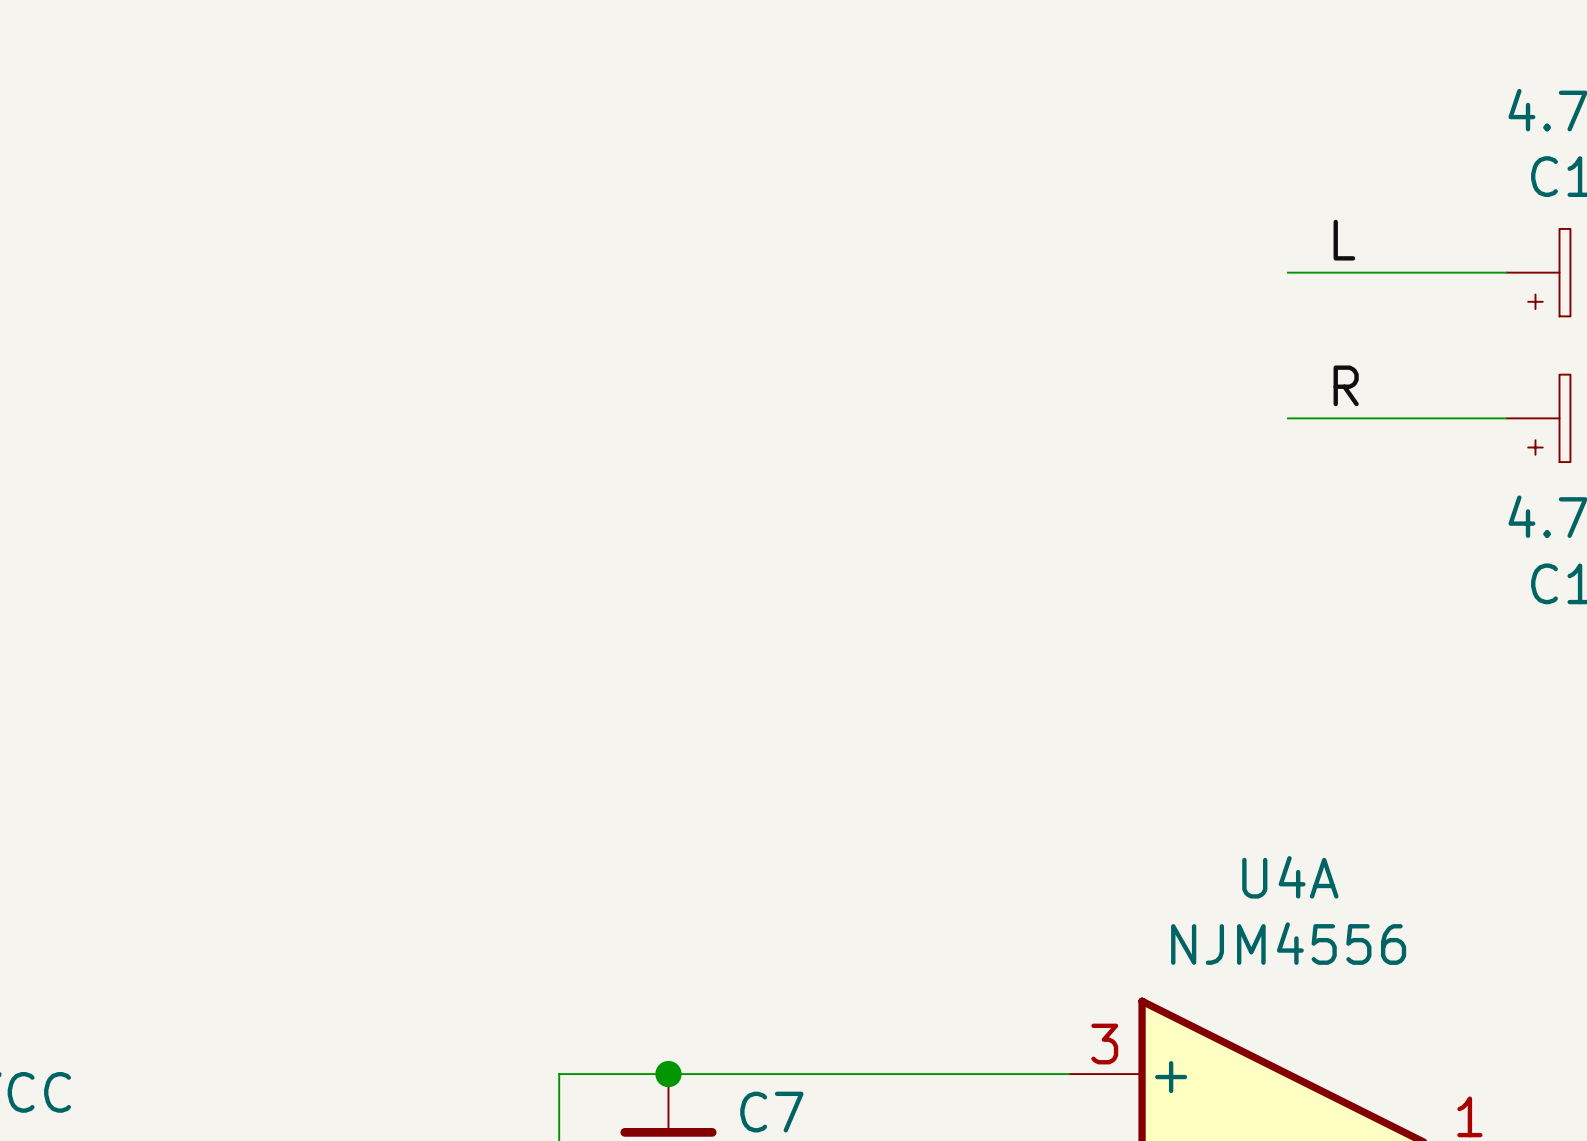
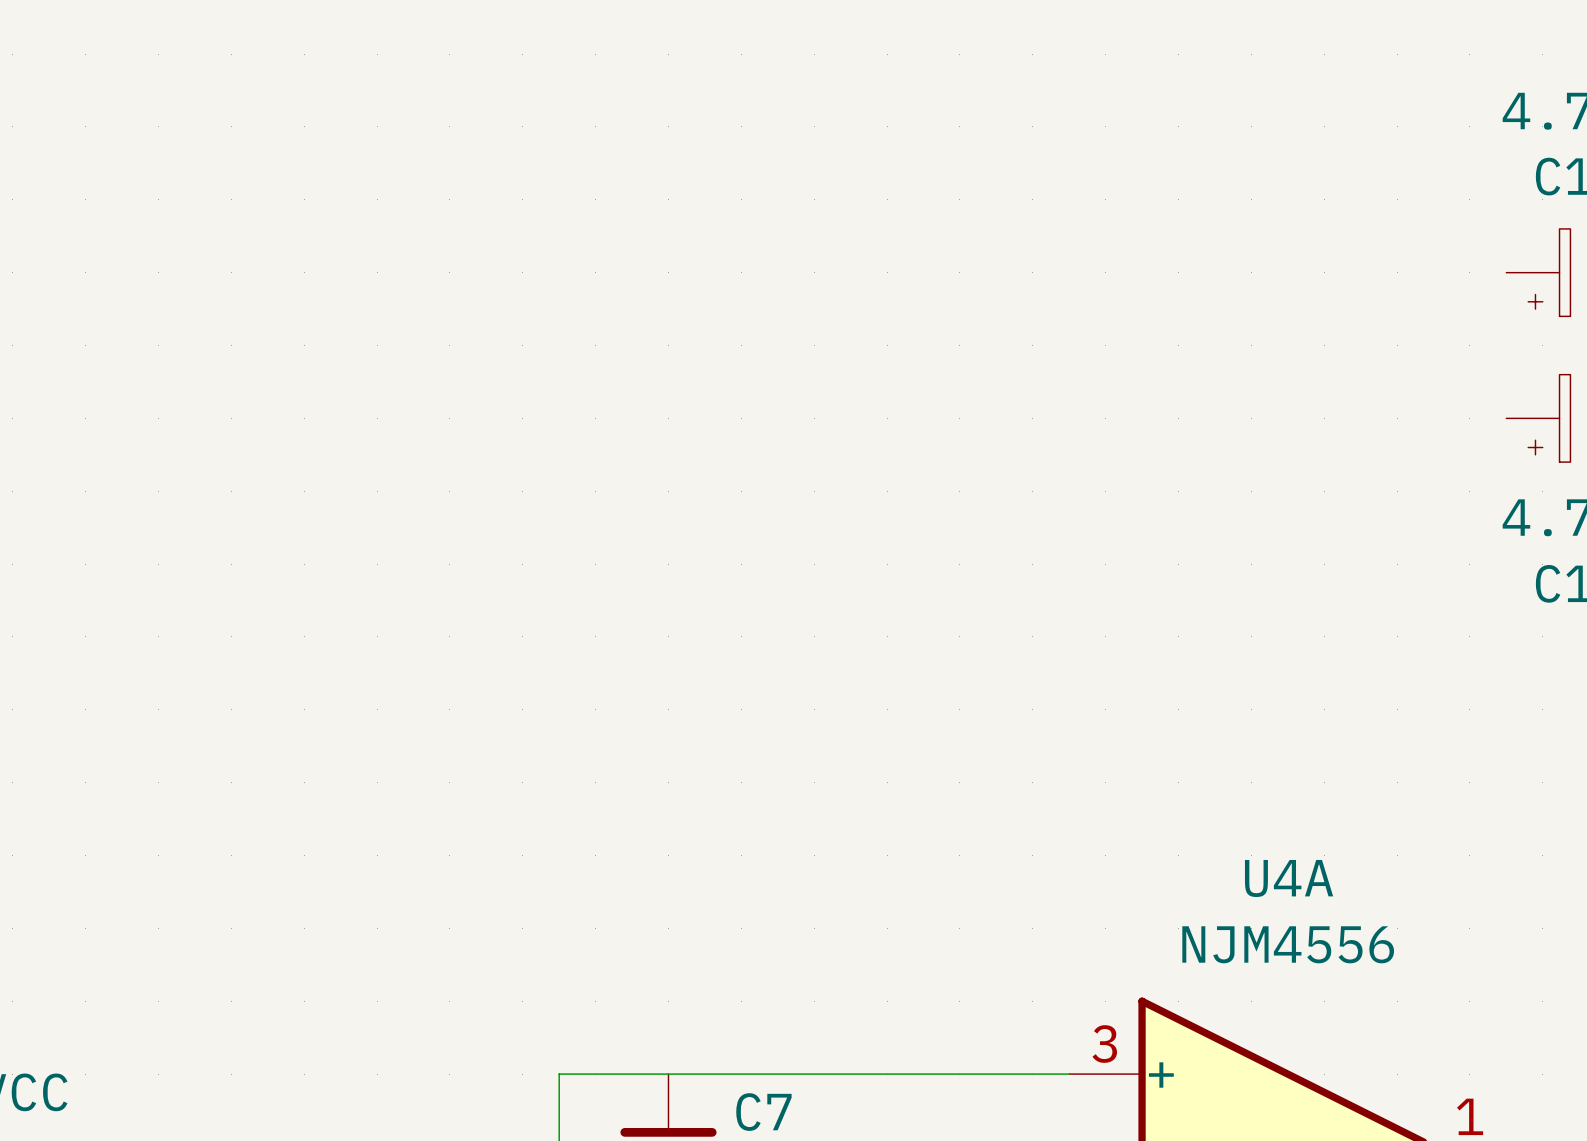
label: L (1344, 240) -> none
wire: (1287, 272) (1506, 272) -> none
label: R (1346, 385) -> none
wire: (1287, 418) (1506, 418) -> none
junction: (668, 1074) -> none

